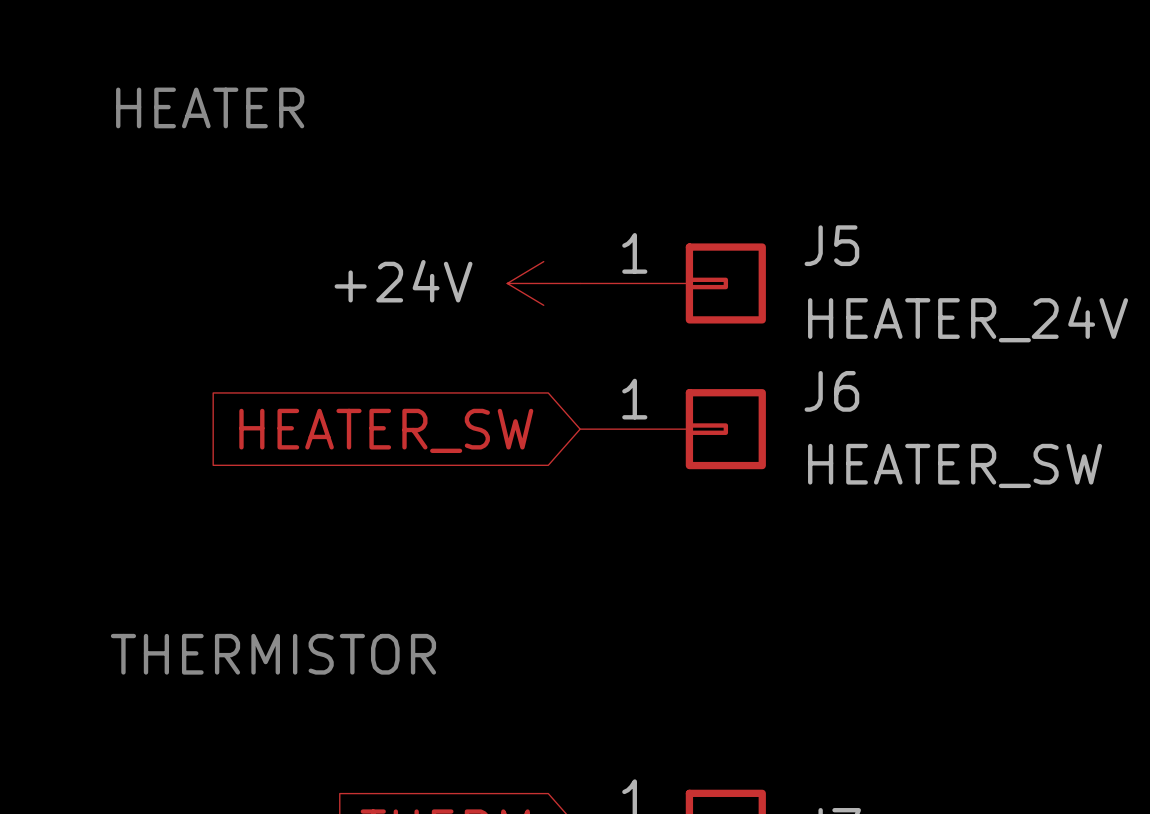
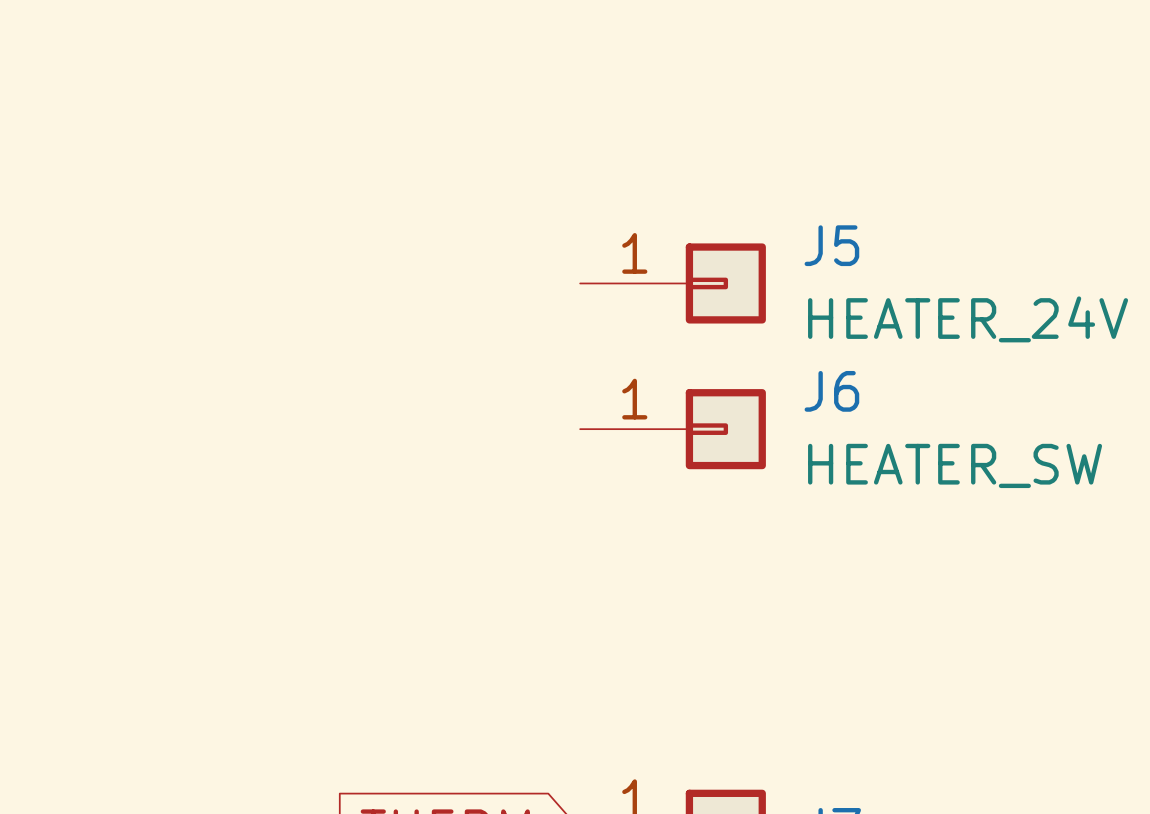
text: HEATER (210, 107) -> none
power symbol: +24V (543, 283) -> none
global label: HEATER_SW (386, 430) -> none
text: THERMISTOR (273, 654) -> none

